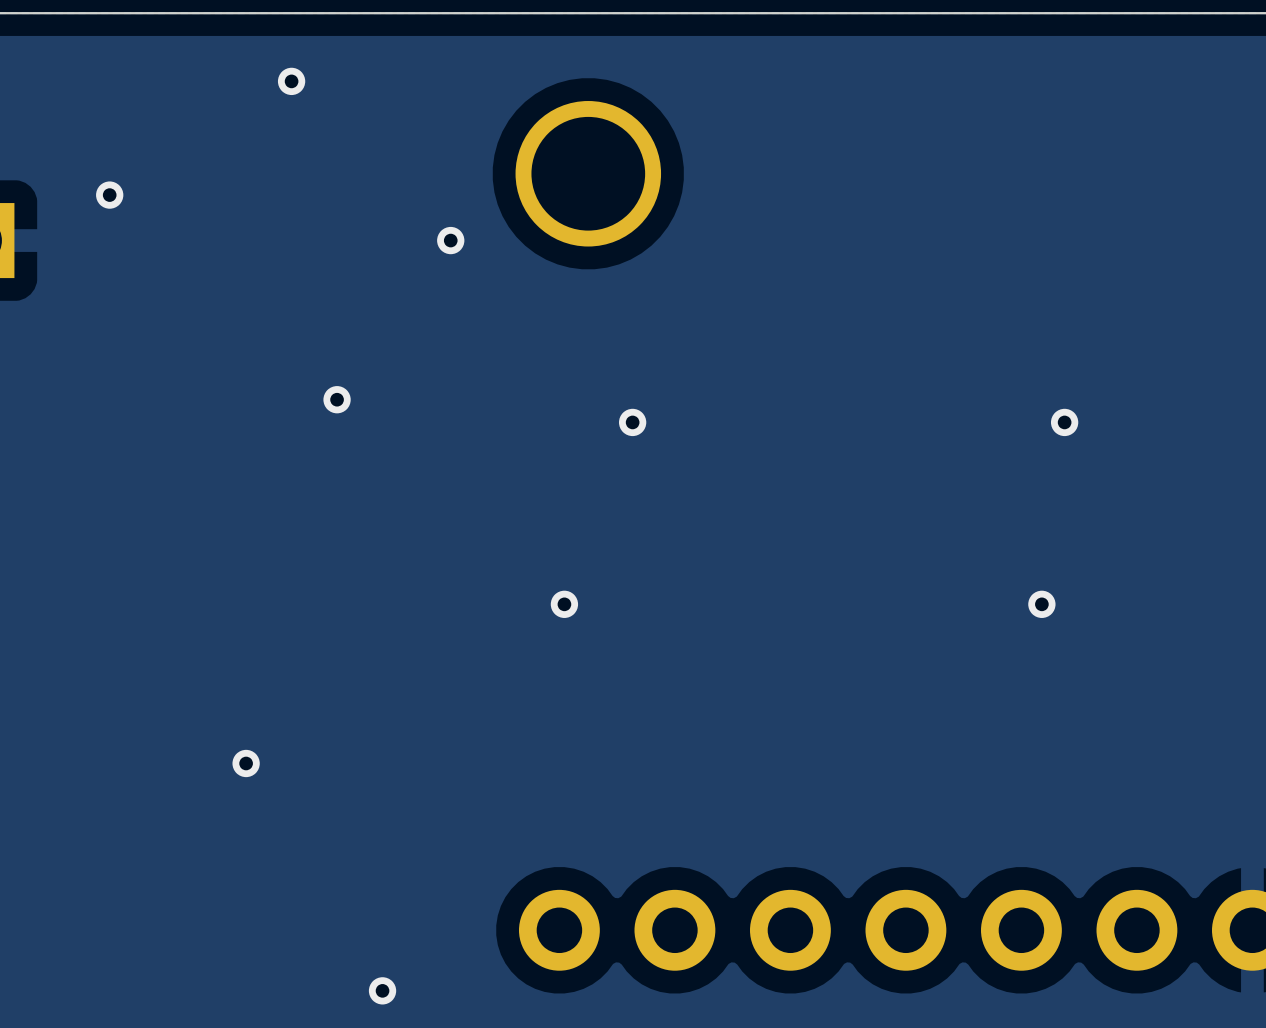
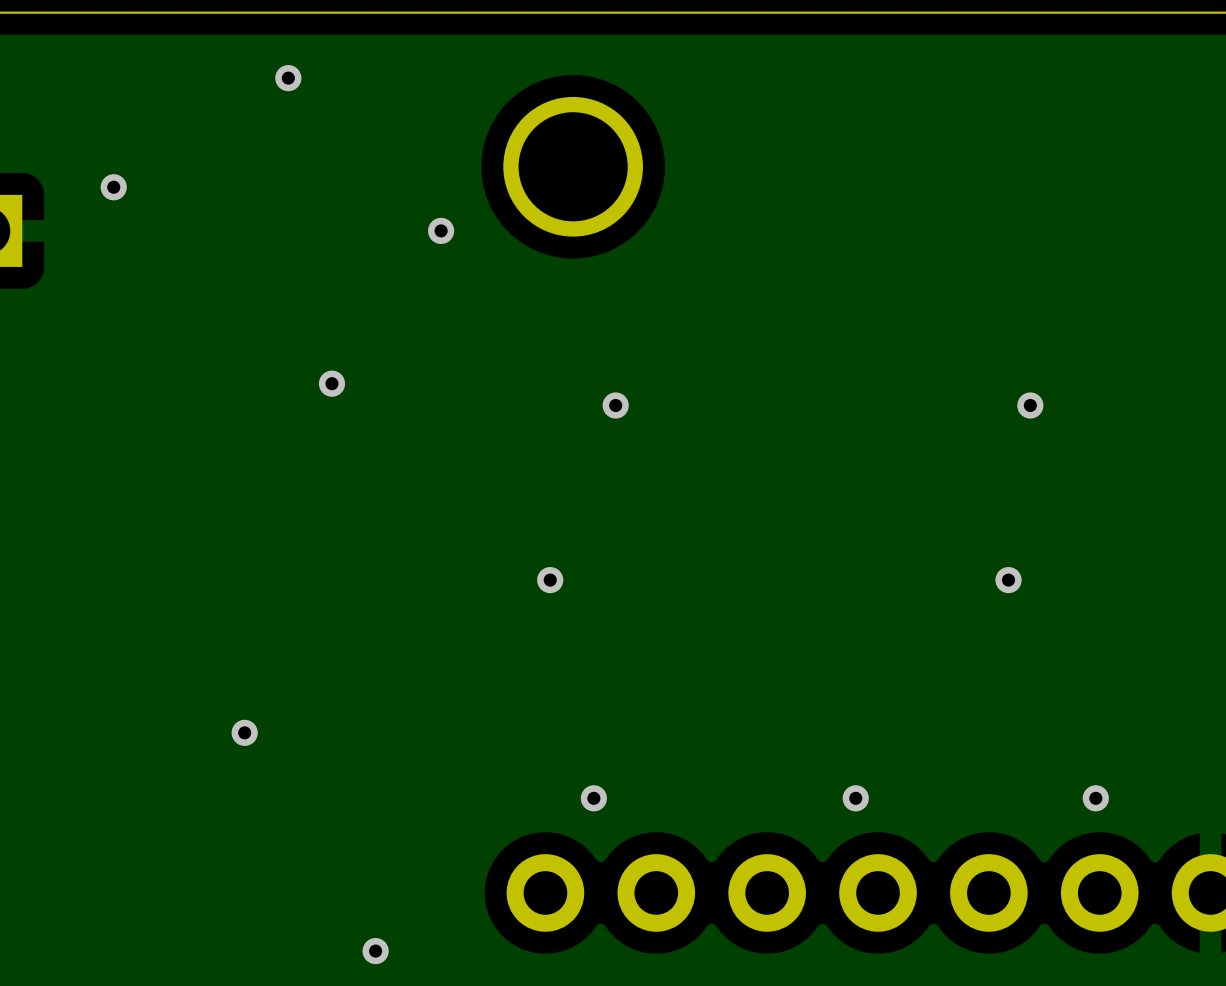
via: none -> (593, 798)
via: none -> (855, 798)
via: none -> (1095, 798)

